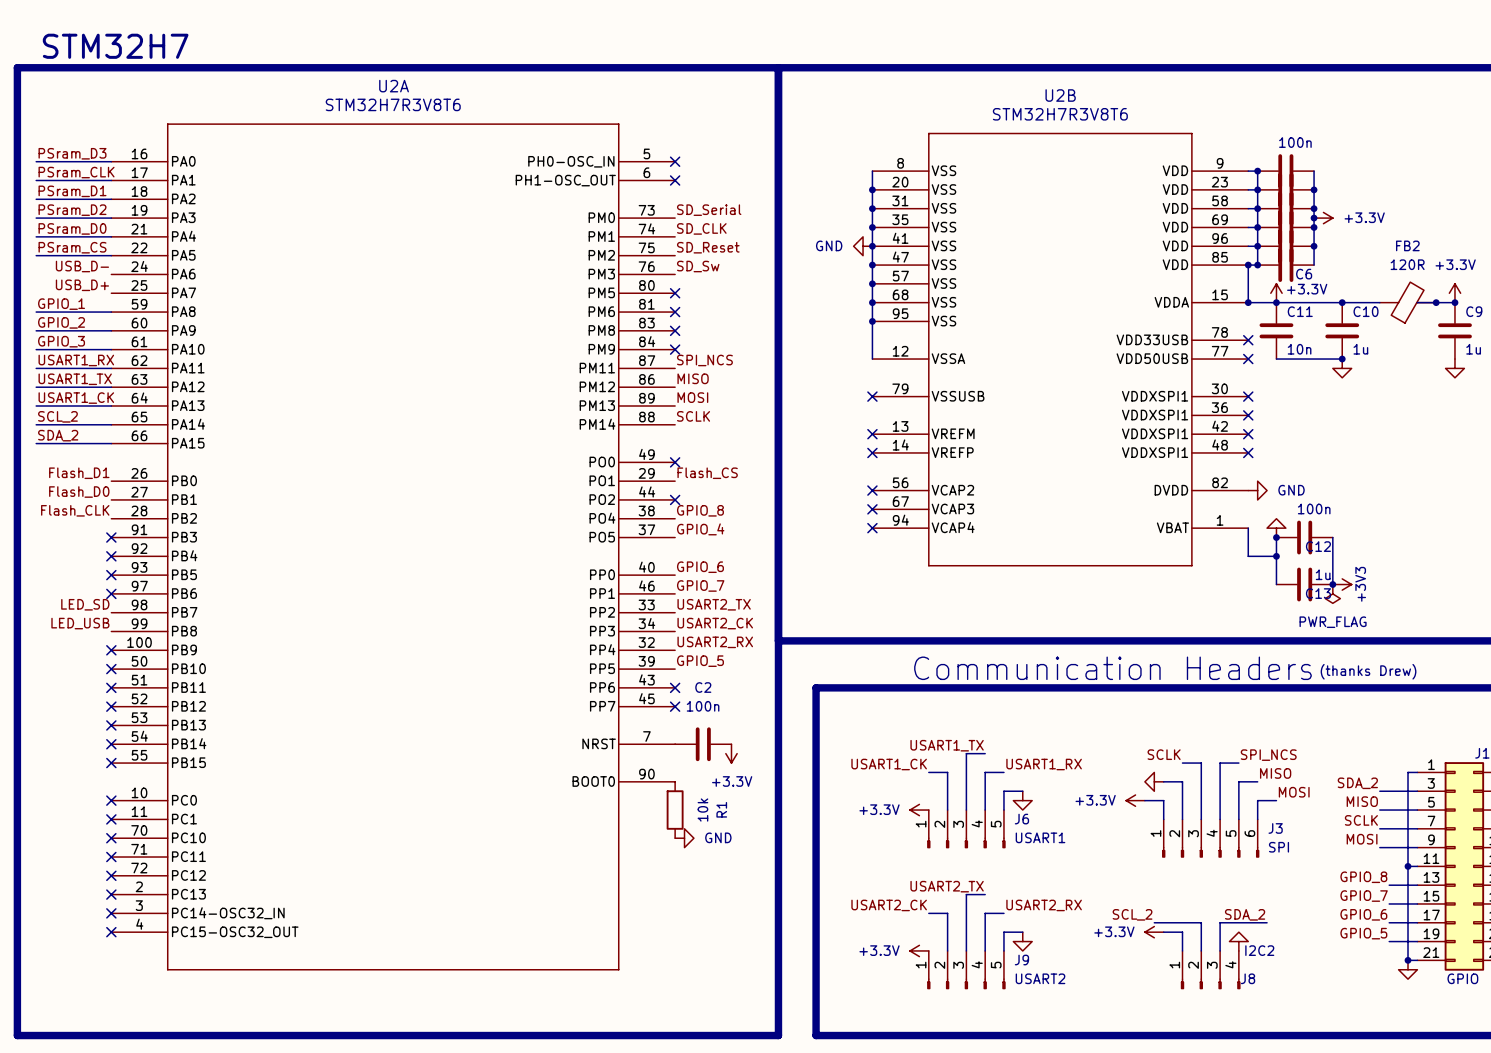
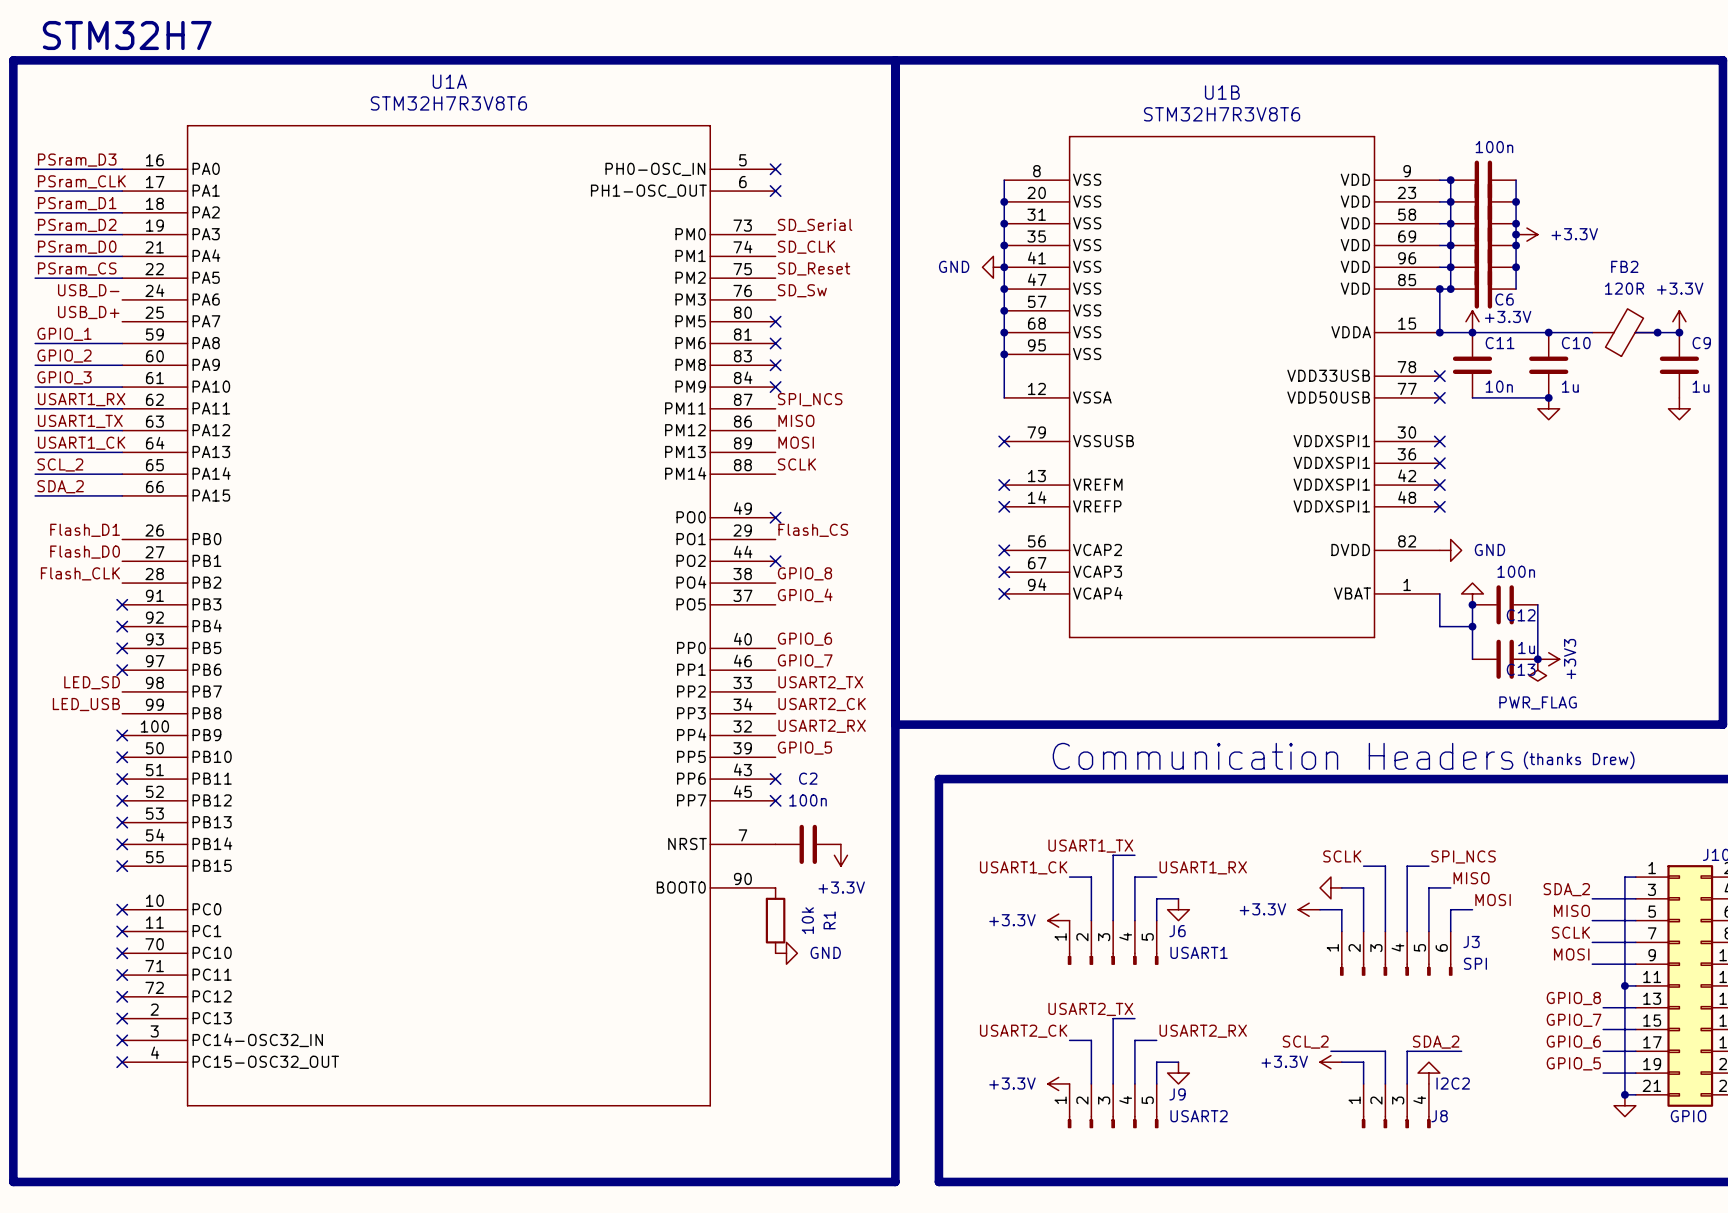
U2A name: U2A (394, 86) -> U1A (449, 81)
U2B name: U2B (1060, 95) -> U1B (1222, 92)

